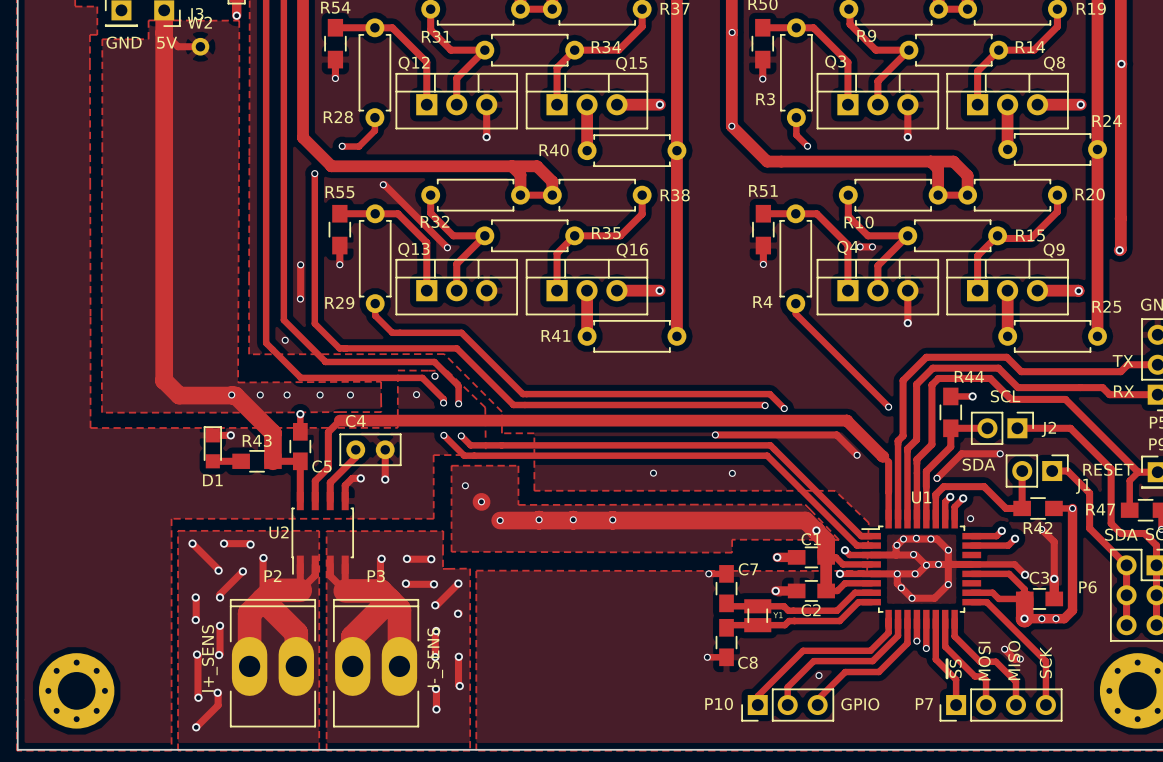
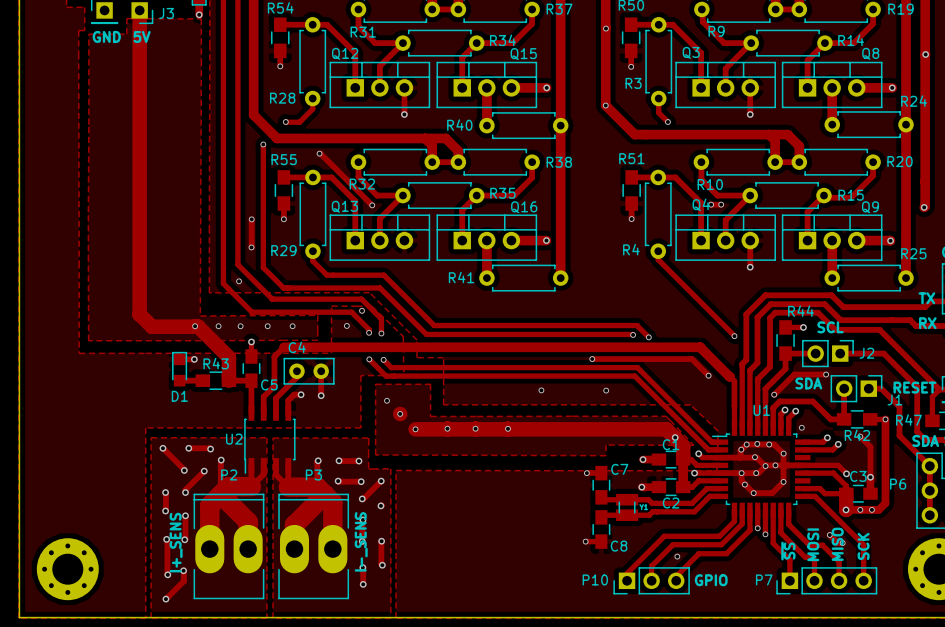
track: (164, 33) (177, 46) (200, 46) -> none
W2: (200, 46) -> none

